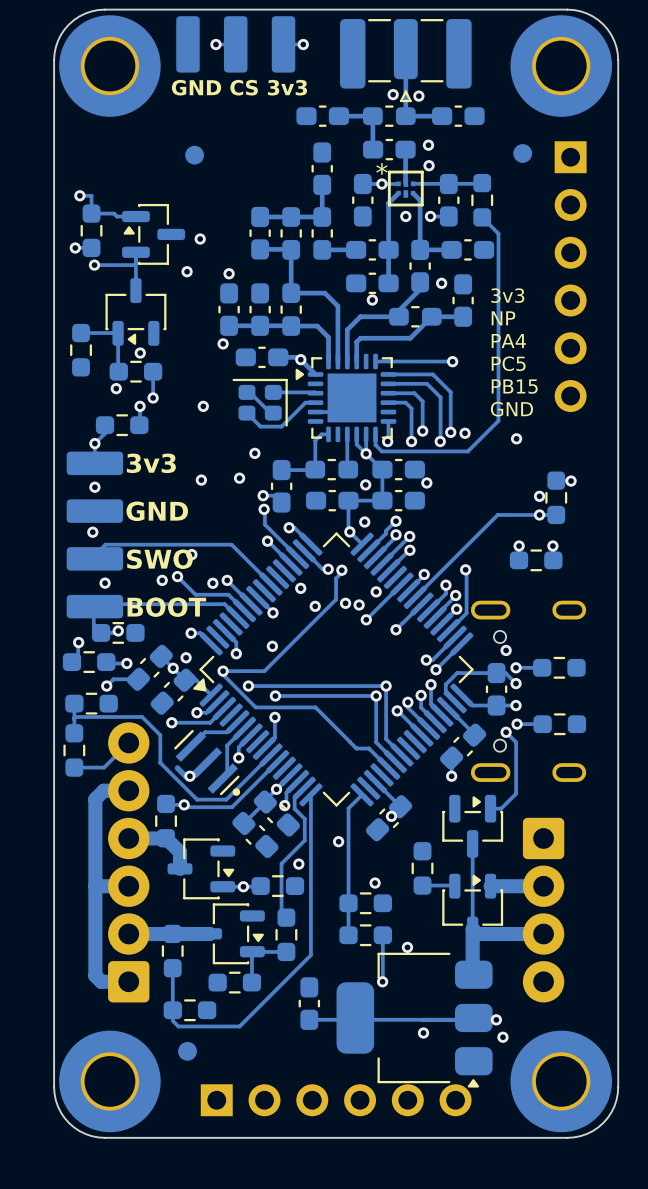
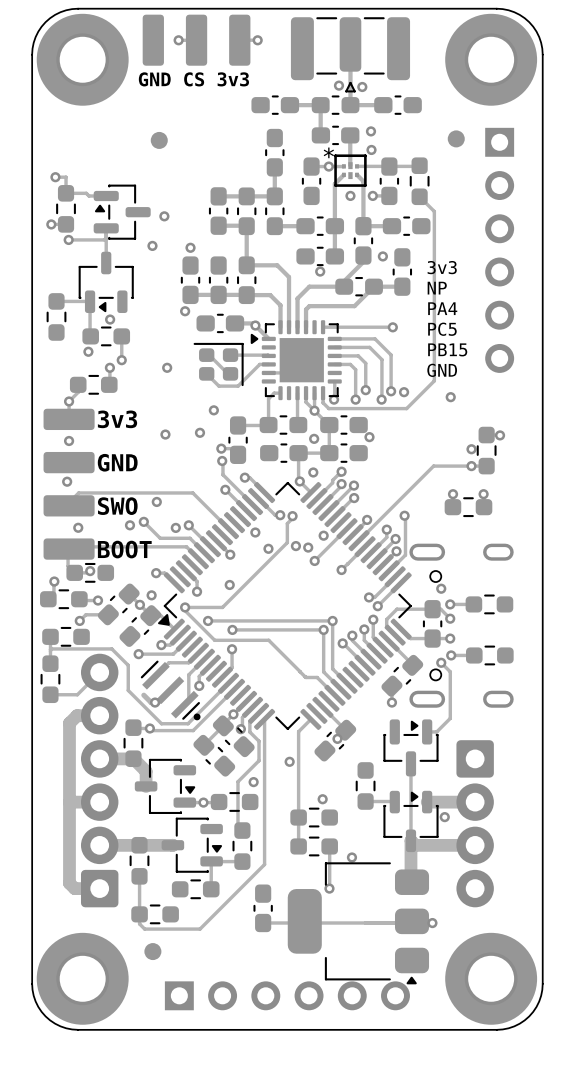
via: none -> (444, 817)
via: (423, 1033) -> none
via: (502, 1037) -> none

